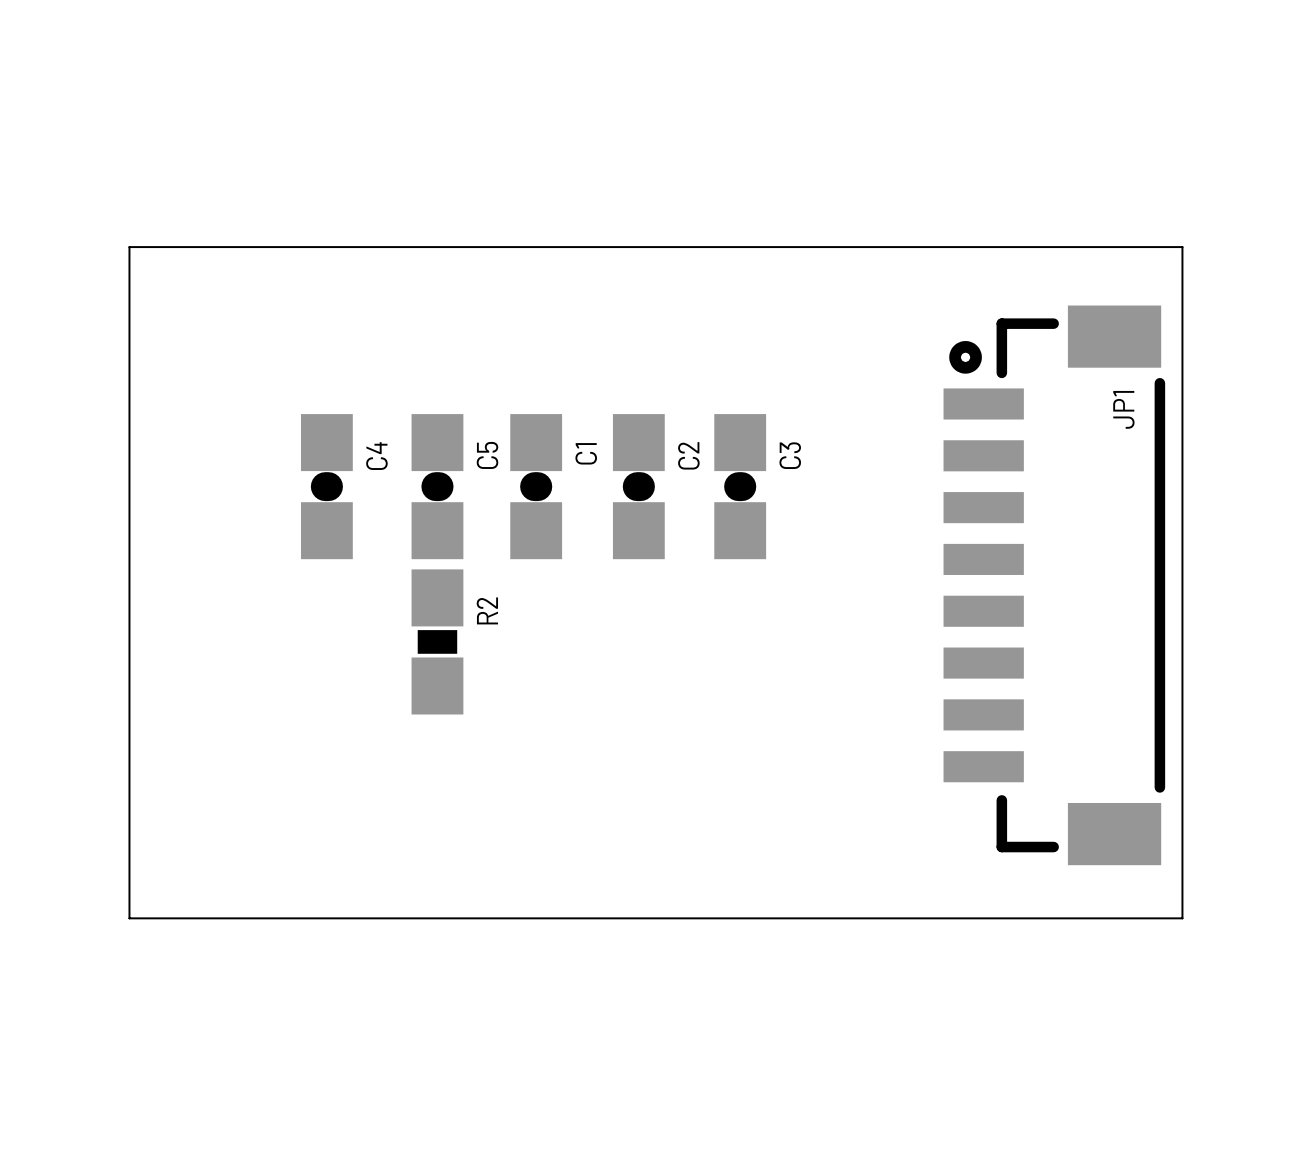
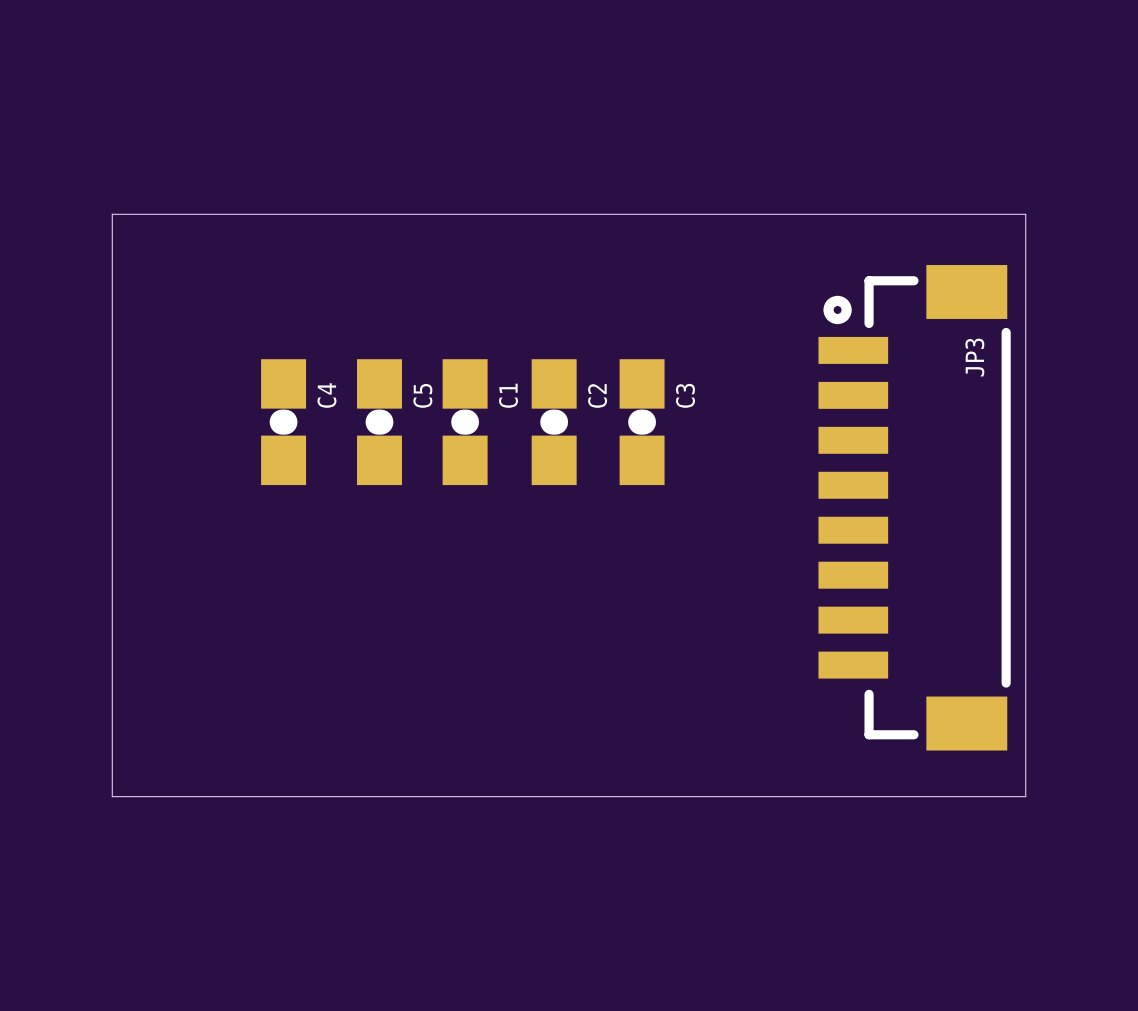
JP1 name: JP1 (1123, 409) -> JP3 (974, 357)
R2: (437, 641) -> none

